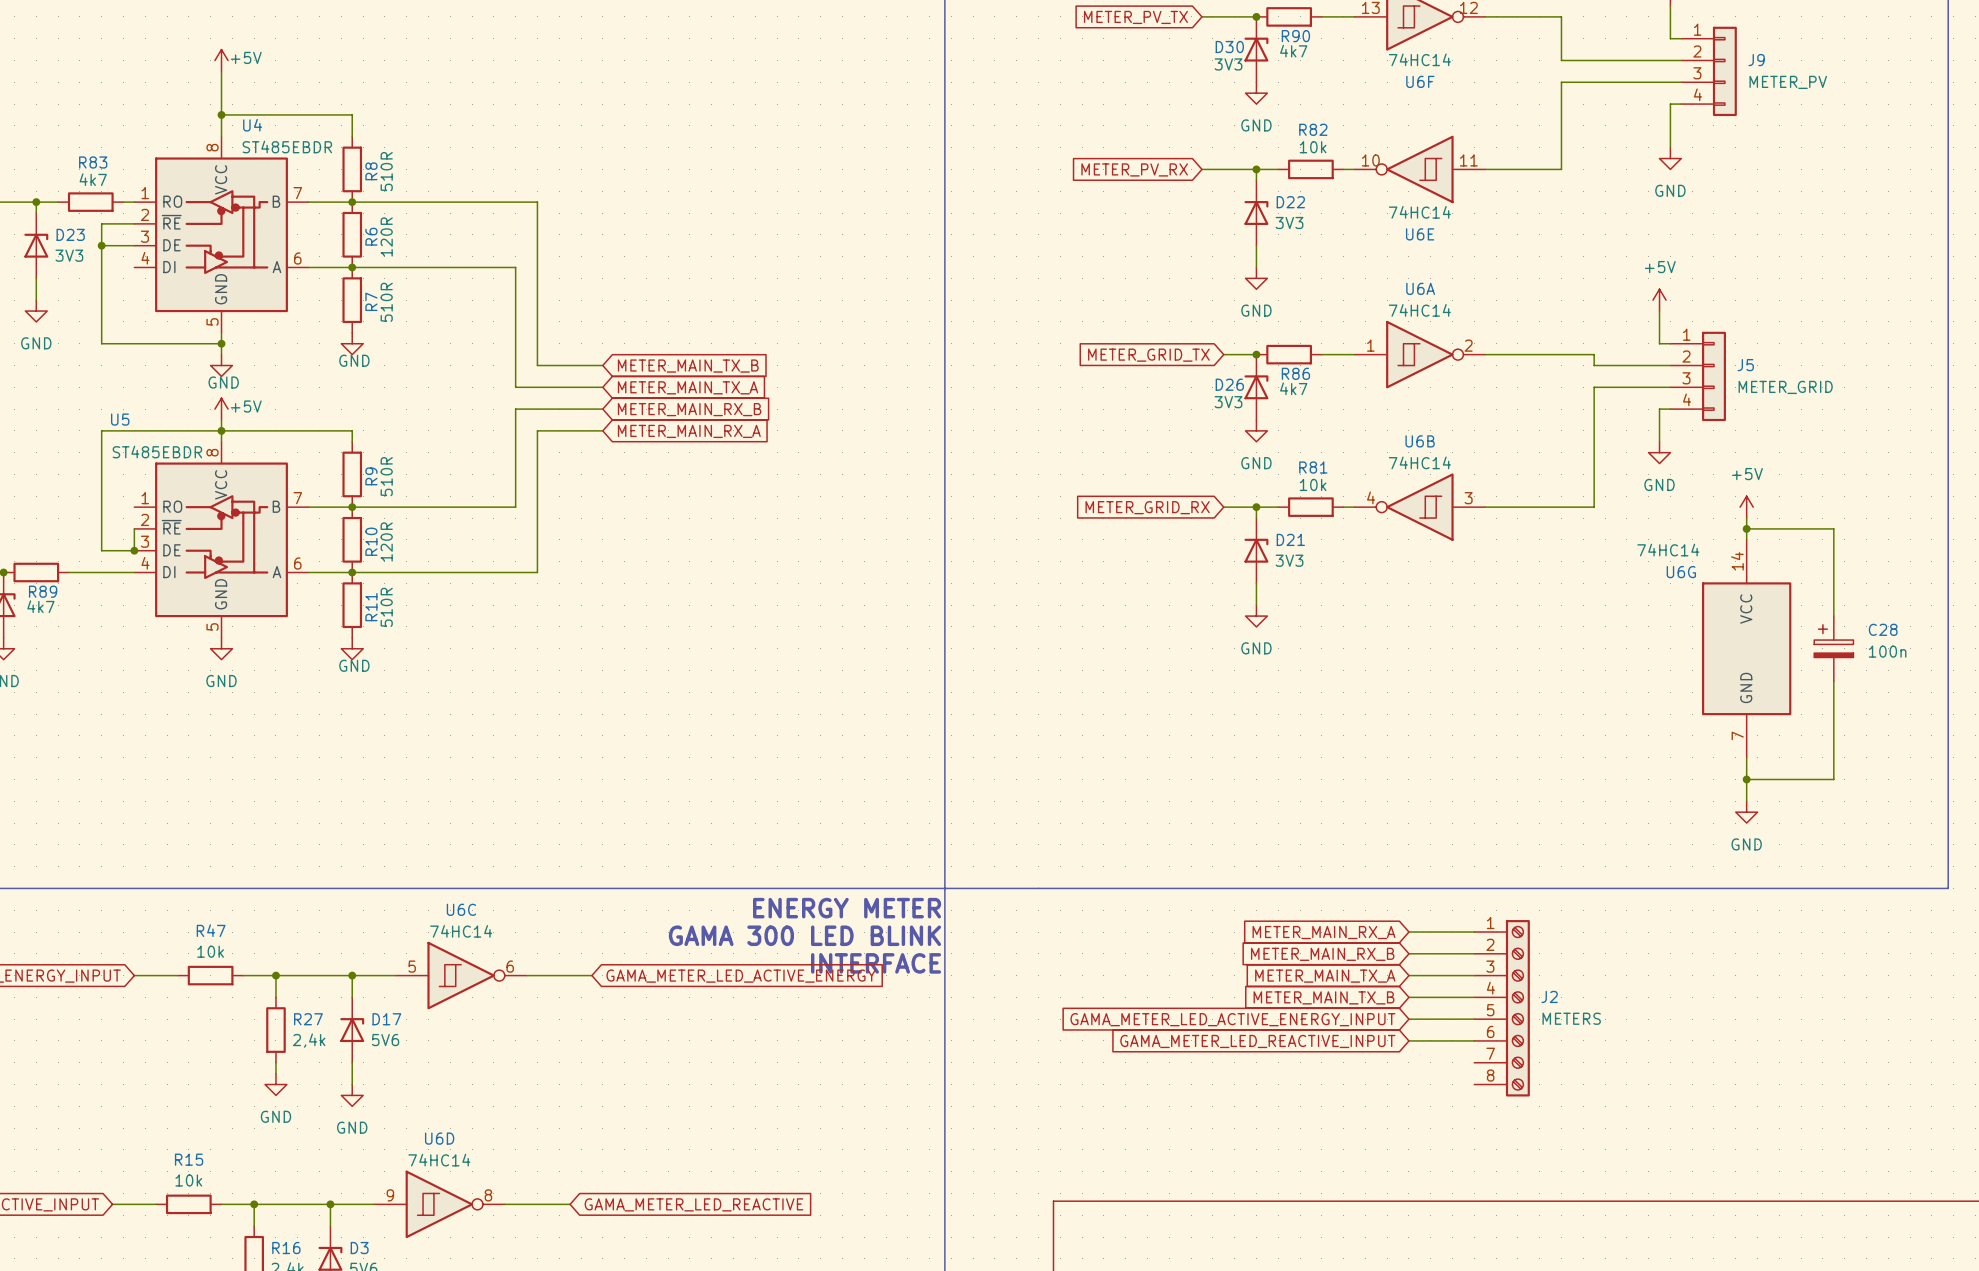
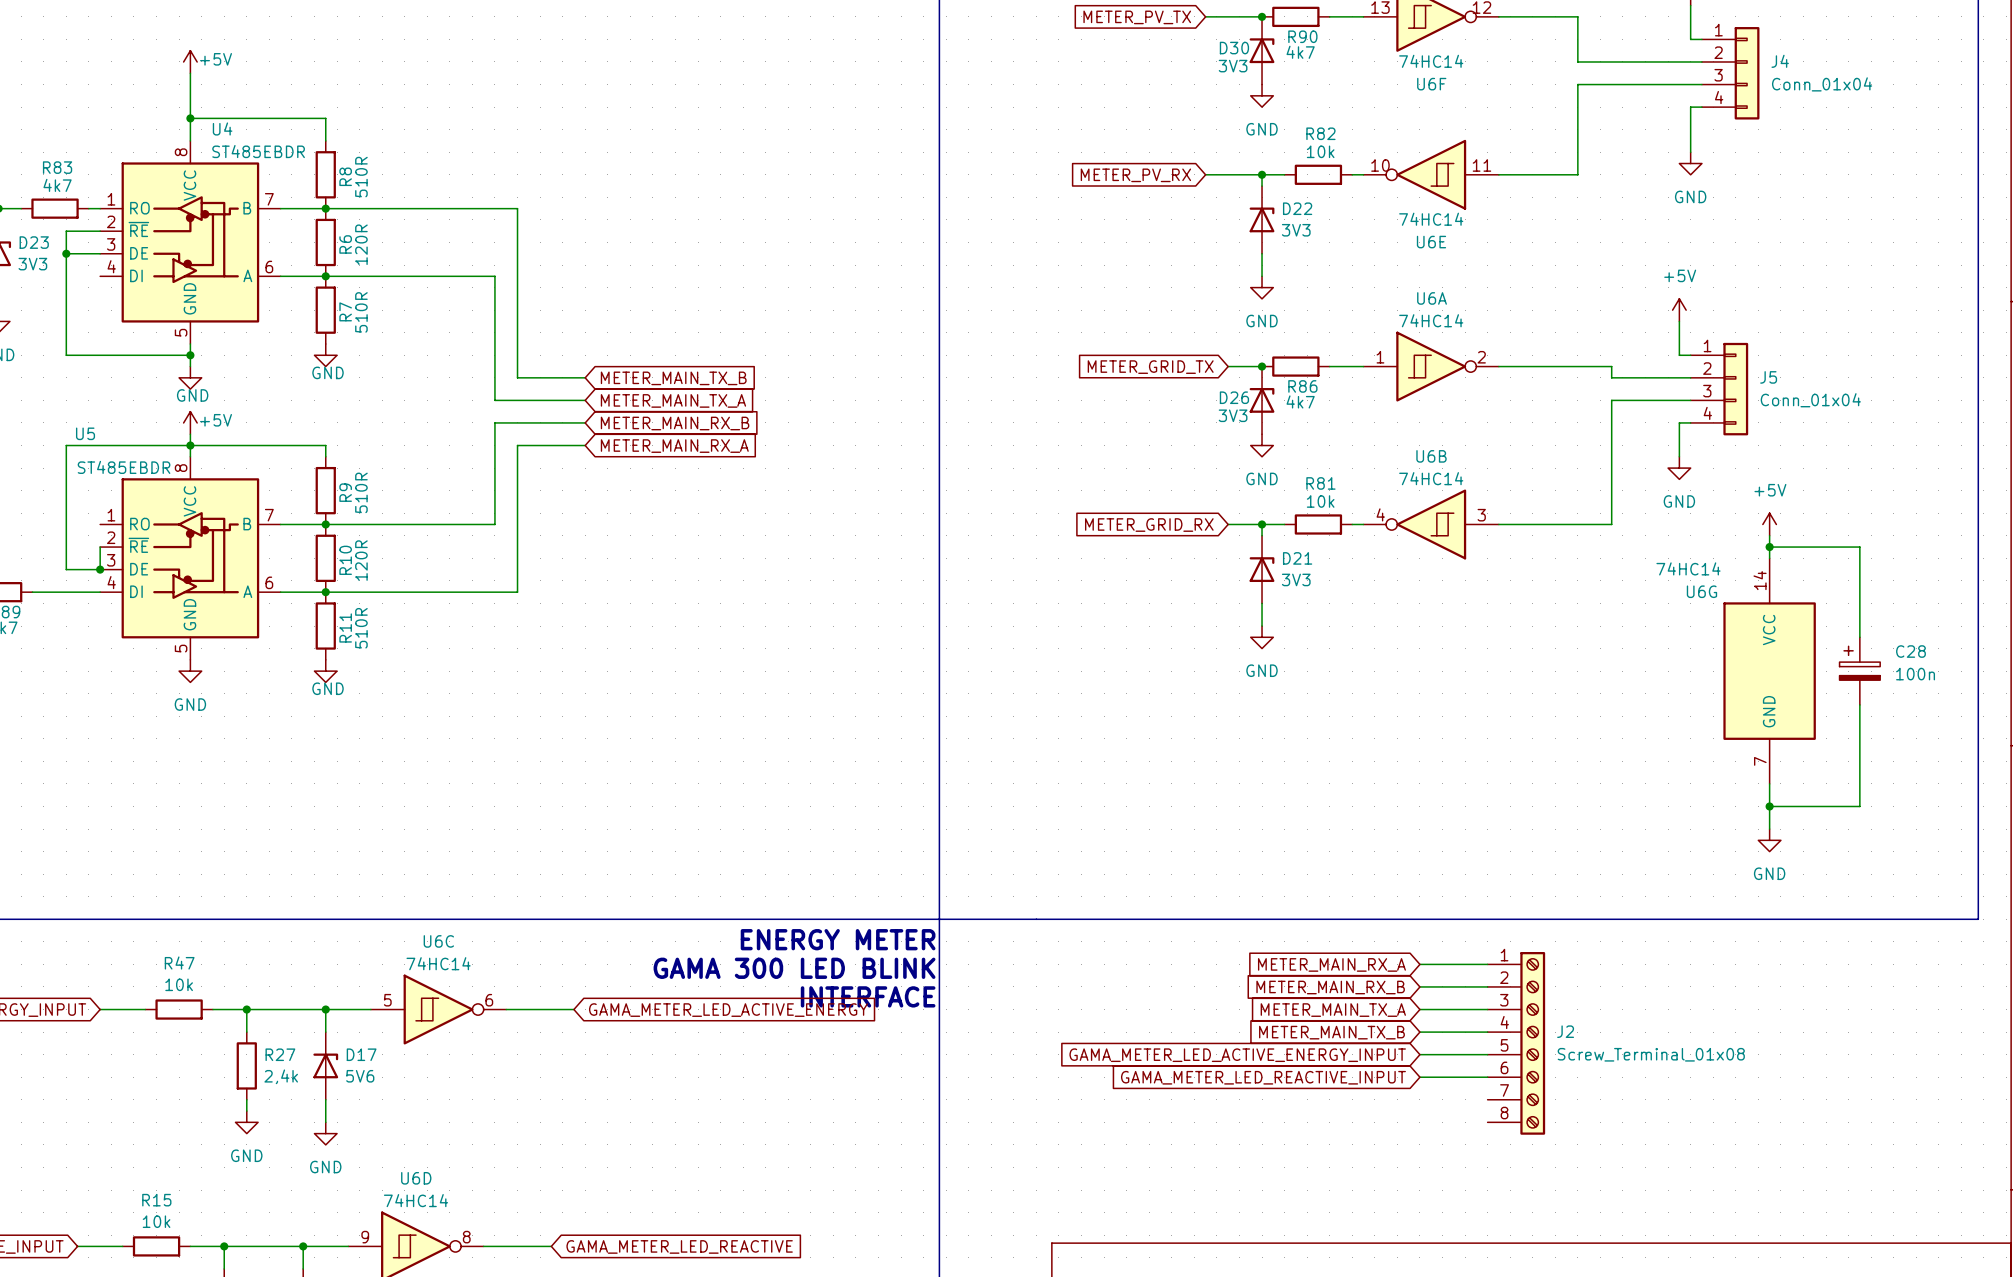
J9 name: J9 (1756, 60) -> J4 (1780, 61)
J9 value: METER_PV (1788, 82) -> Conn_01x04 (1822, 84)
J5 value: METER_GRID (1785, 387) -> Conn_01x04 (1810, 400)
J2 value: METERS (1571, 1018) -> Screw_Terminal_01x08 (1651, 1054)

